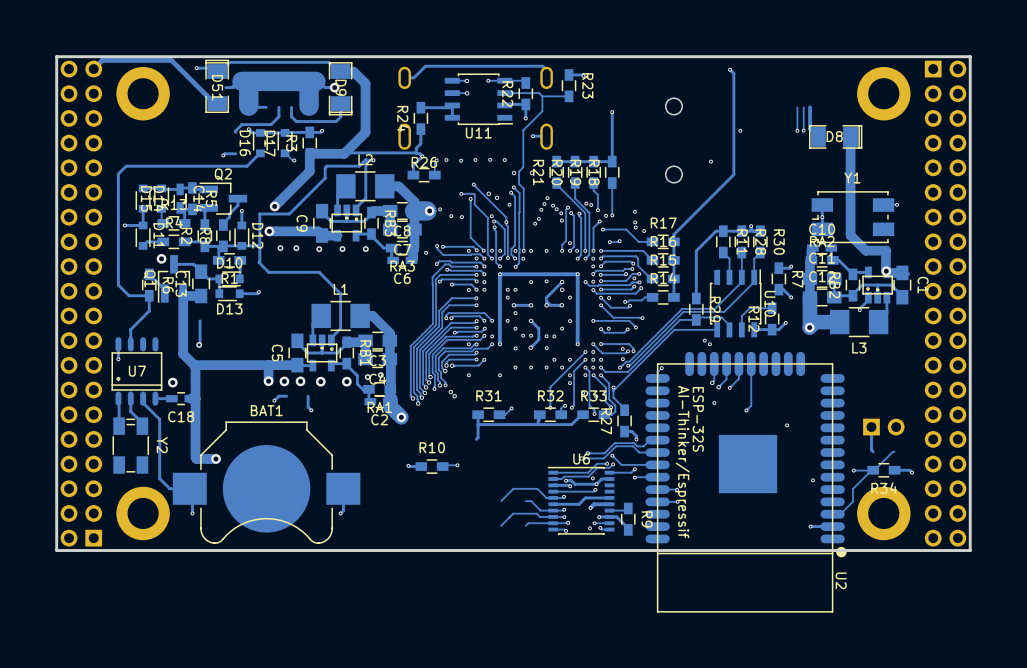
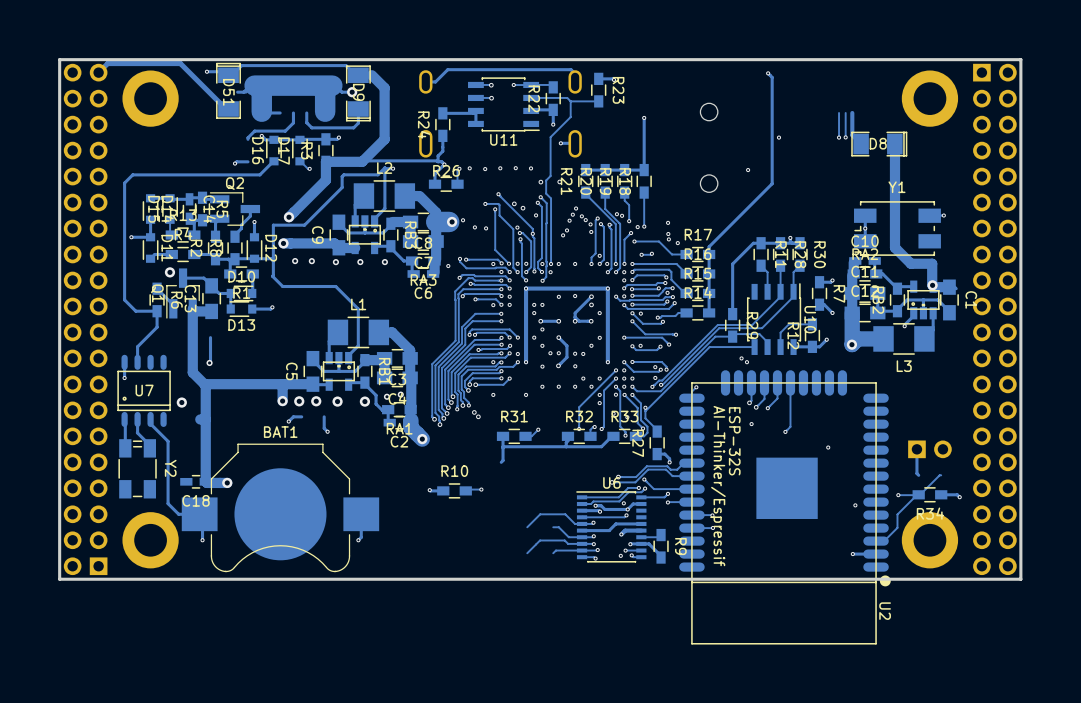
track: (171, 398) (155, 398) -> none
C18 position: (181, 398) -> (196, 481)

